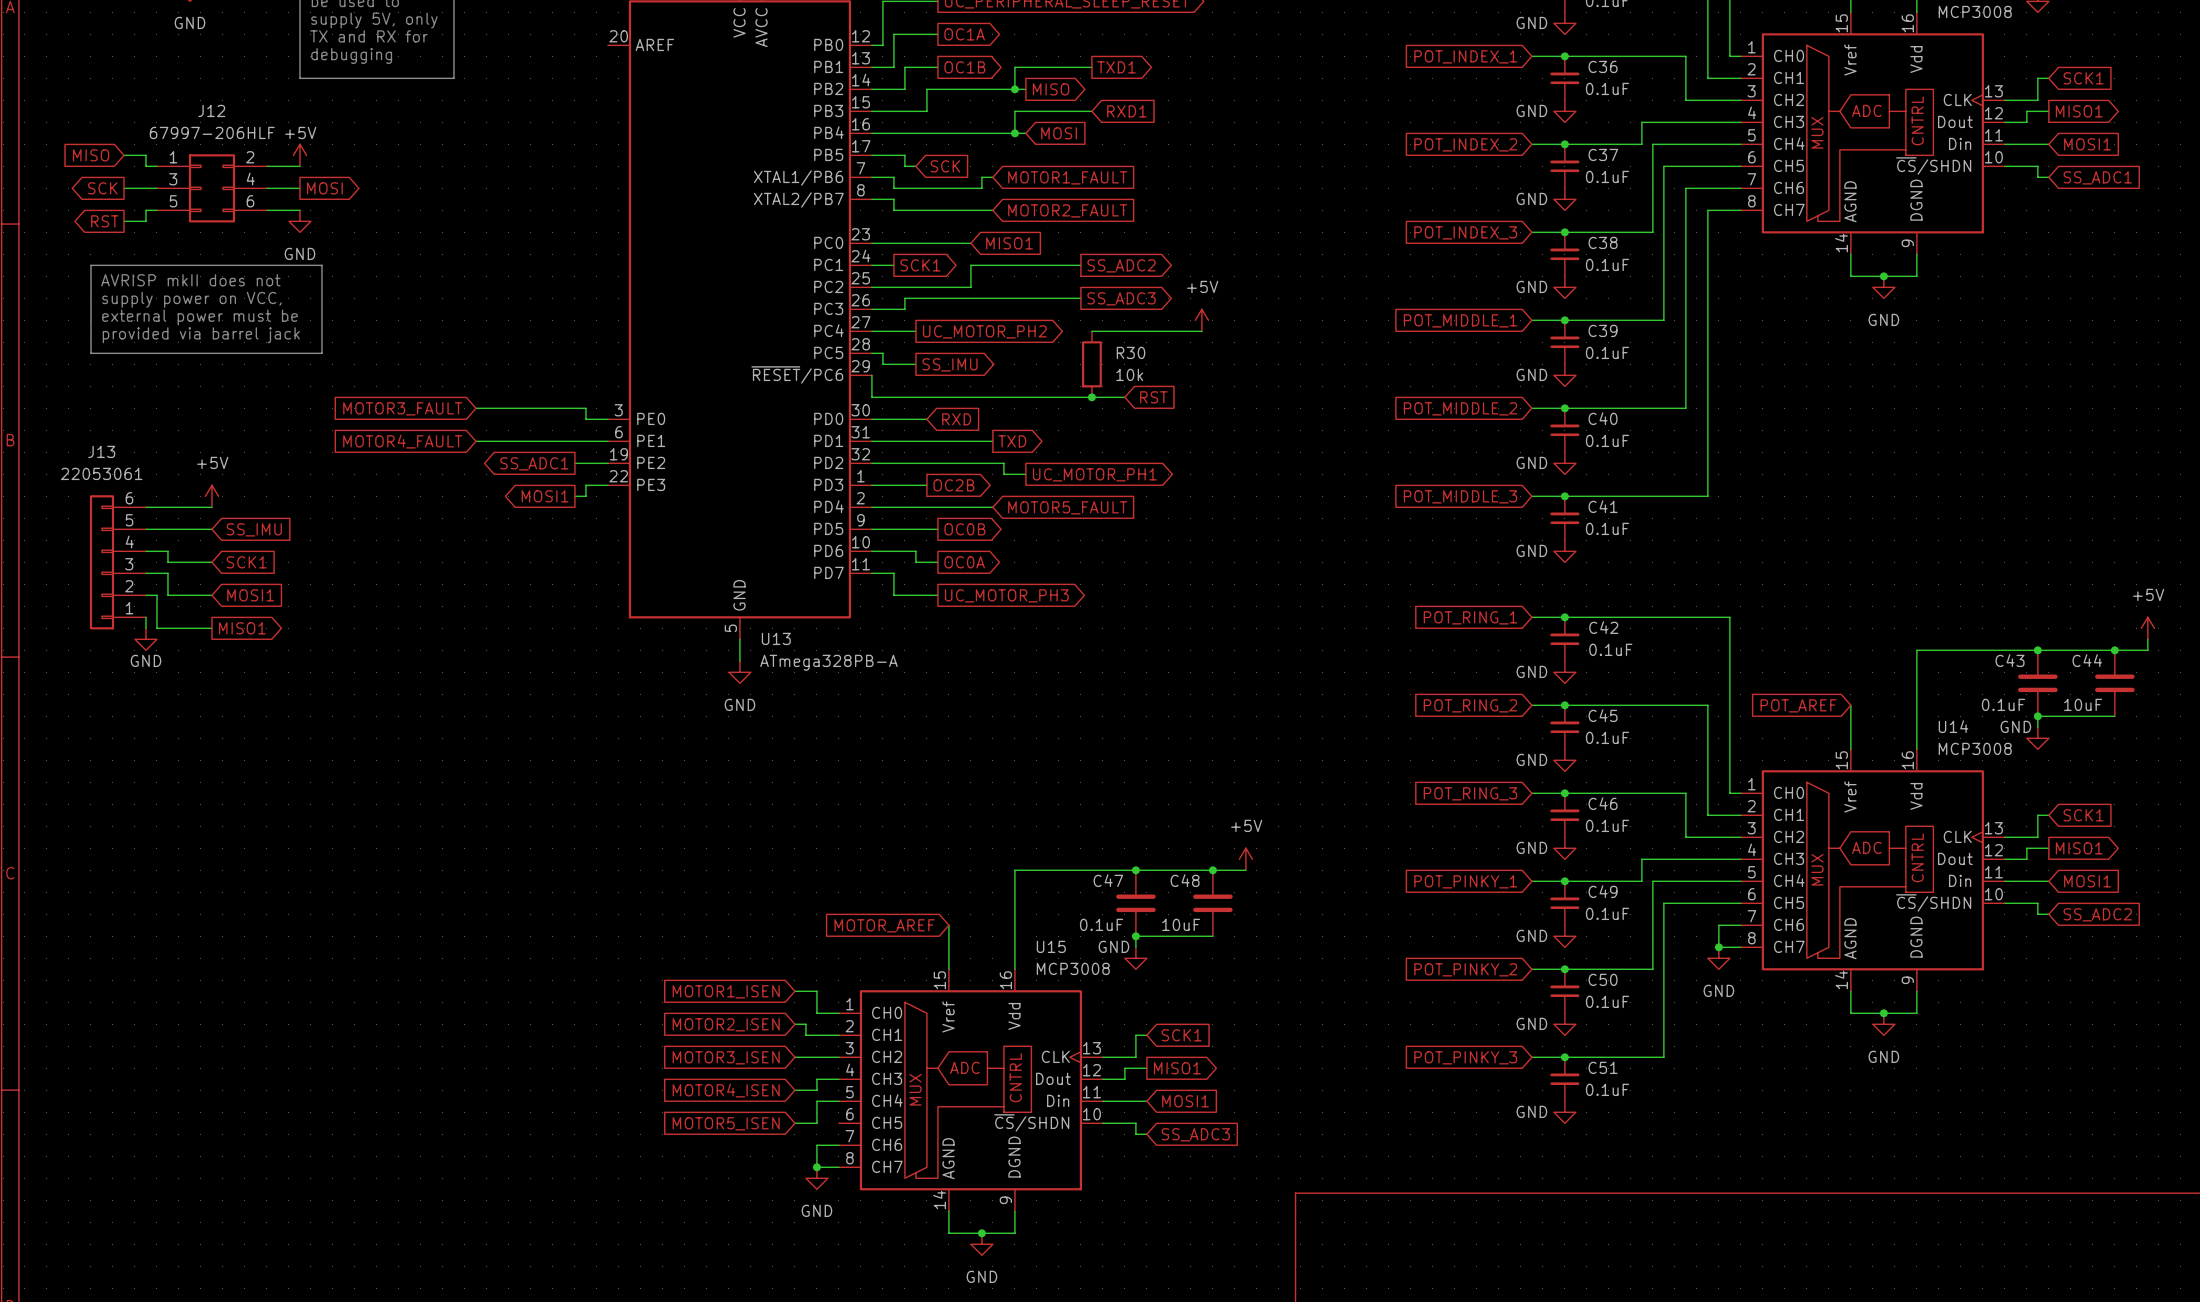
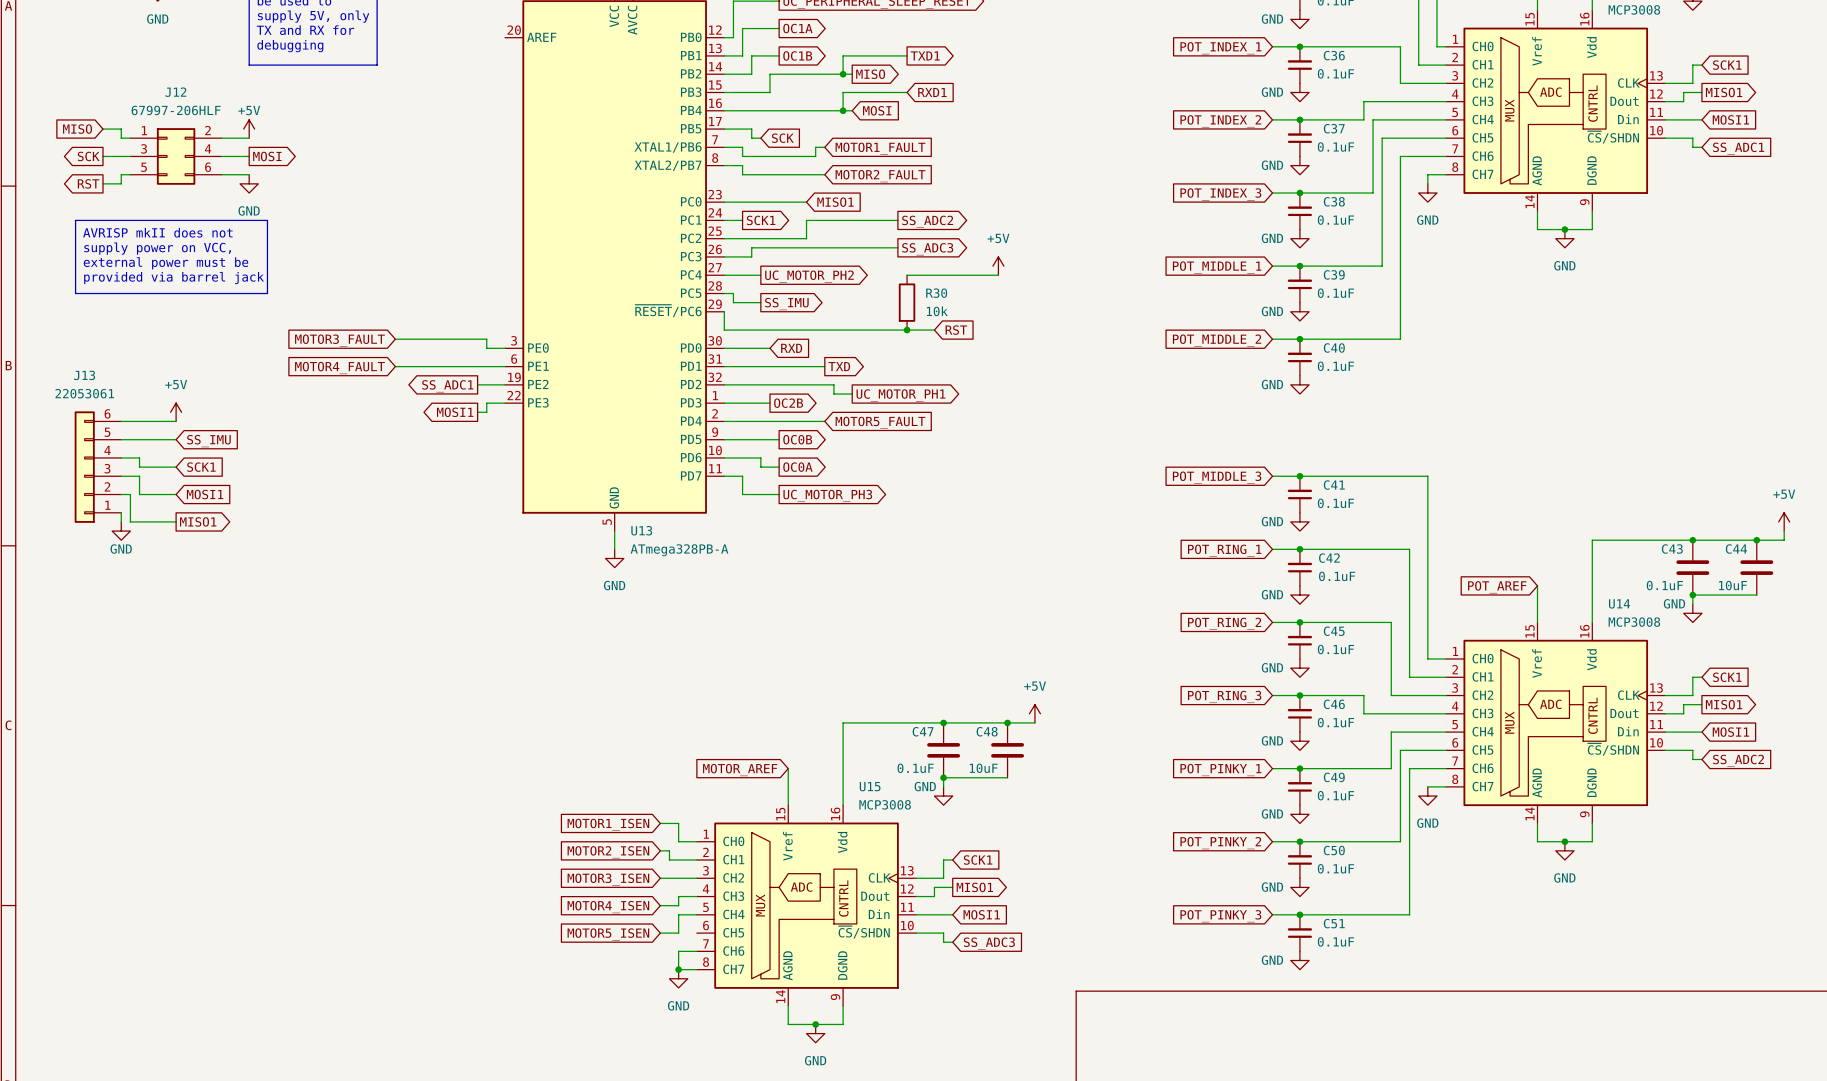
wire: (1718, 210) (1707, 210) (1707, 496) (1531, 496) -> (1427, 174) (1427, 183)
power symbol: none -> GND (1427, 193)
global label position: POT_MIDDLE_3 (1460, 496) -> POT_MIDDLE_3 (1217, 477)
junction: (1564, 496) -> none
C41 position: (1564, 518) -> (1299, 494)
power symbol: GND (1564, 551) -> none
junction: none -> (1299, 476)
global label position: POT_RING_1 (1470, 617) -> POT_RING_1 (1224, 550)
wire: (1531, 617) (1729, 617) (1729, 793) -> (1272, 476) (1427, 476) (1427, 658) (1436, 658)
junction: (1564, 617) -> none
power symbol: none -> GND (1299, 521)
C42 position: (1564, 639) -> (1299, 567)
junction: none -> (1299, 549)
power symbol: GND (1564, 672) -> none
global label position: POT_RING_2 (1470, 705) -> POT_RING_2 (1224, 623)
wire: (1531, 705) (1707, 705) (1707, 815) -> (1272, 549) (1409, 549) (1409, 677) (1418, 677)
junction: (1564, 705) -> none
power symbol: none -> GND (1299, 595)
C45 position: (1564, 727) -> (1299, 640)
junction: none -> (1299, 622)
power symbol: GND (1564, 760) -> none
global label position: POT_RING_3 (1470, 793) -> POT_RING_3 (1224, 696)
wire: (1531, 793) (1685, 793) (1685, 837) -> (1272, 622) (1391, 622) (1391, 695) (1400, 695)
junction: (1564, 793) -> none
power symbol: none -> GND (1299, 668)
C46 position: (1564, 815) -> (1299, 713)
junction: none -> (1299, 695)
power symbol: GND (1564, 848) -> none
wire: (1641, 859) (1641, 881) (1531, 881) -> (1363, 713) (1363, 695) (1272, 695)
global label position: POT_PINKY_1 (1465, 881) -> POT_PINKY_1 (1220, 770)
junction: (1564, 881) -> none
wire: (1674, 881) (1652, 881) (1652, 969) (1531, 969) -> (1391, 732) (1391, 768) (1272, 768)
power symbol: none -> GND (1299, 741)
C49 position: (1564, 903) -> (1299, 786)
wire: (1685, 903) (1663, 903) (1663, 1057) (1531, 1057) -> (1400, 750) (1400, 841) (1272, 841)
junction: none -> (1299, 768)
wire: (1718, 925) (1718, 947) -> (1427, 768) (1409, 768) (1409, 914) (1272, 914)
power symbol: GND (1564, 936) -> none
junction: (1718, 947) -> none
global label position: POT_PINKY_2 (1465, 969) -> POT_PINKY_2 (1220, 843)
junction: (1564, 969) -> none
power symbol: none -> GND (1299, 814)
C50 position: (1564, 991) -> (1299, 860)
junction: none -> (1299, 841)
power symbol: GND (1564, 1024) -> none
global label position: POT_PINKY_3 (1465, 1057) -> POT_PINKY_3 (1220, 916)
junction: (1564, 1057) -> none
power symbol: none -> GND (1299, 887)
C51 position: (1564, 1079) -> (1299, 933)
junction: none -> (1299, 914)
power symbol: GND (1564, 1112) -> none
power symbol: none -> GND (1299, 960)

